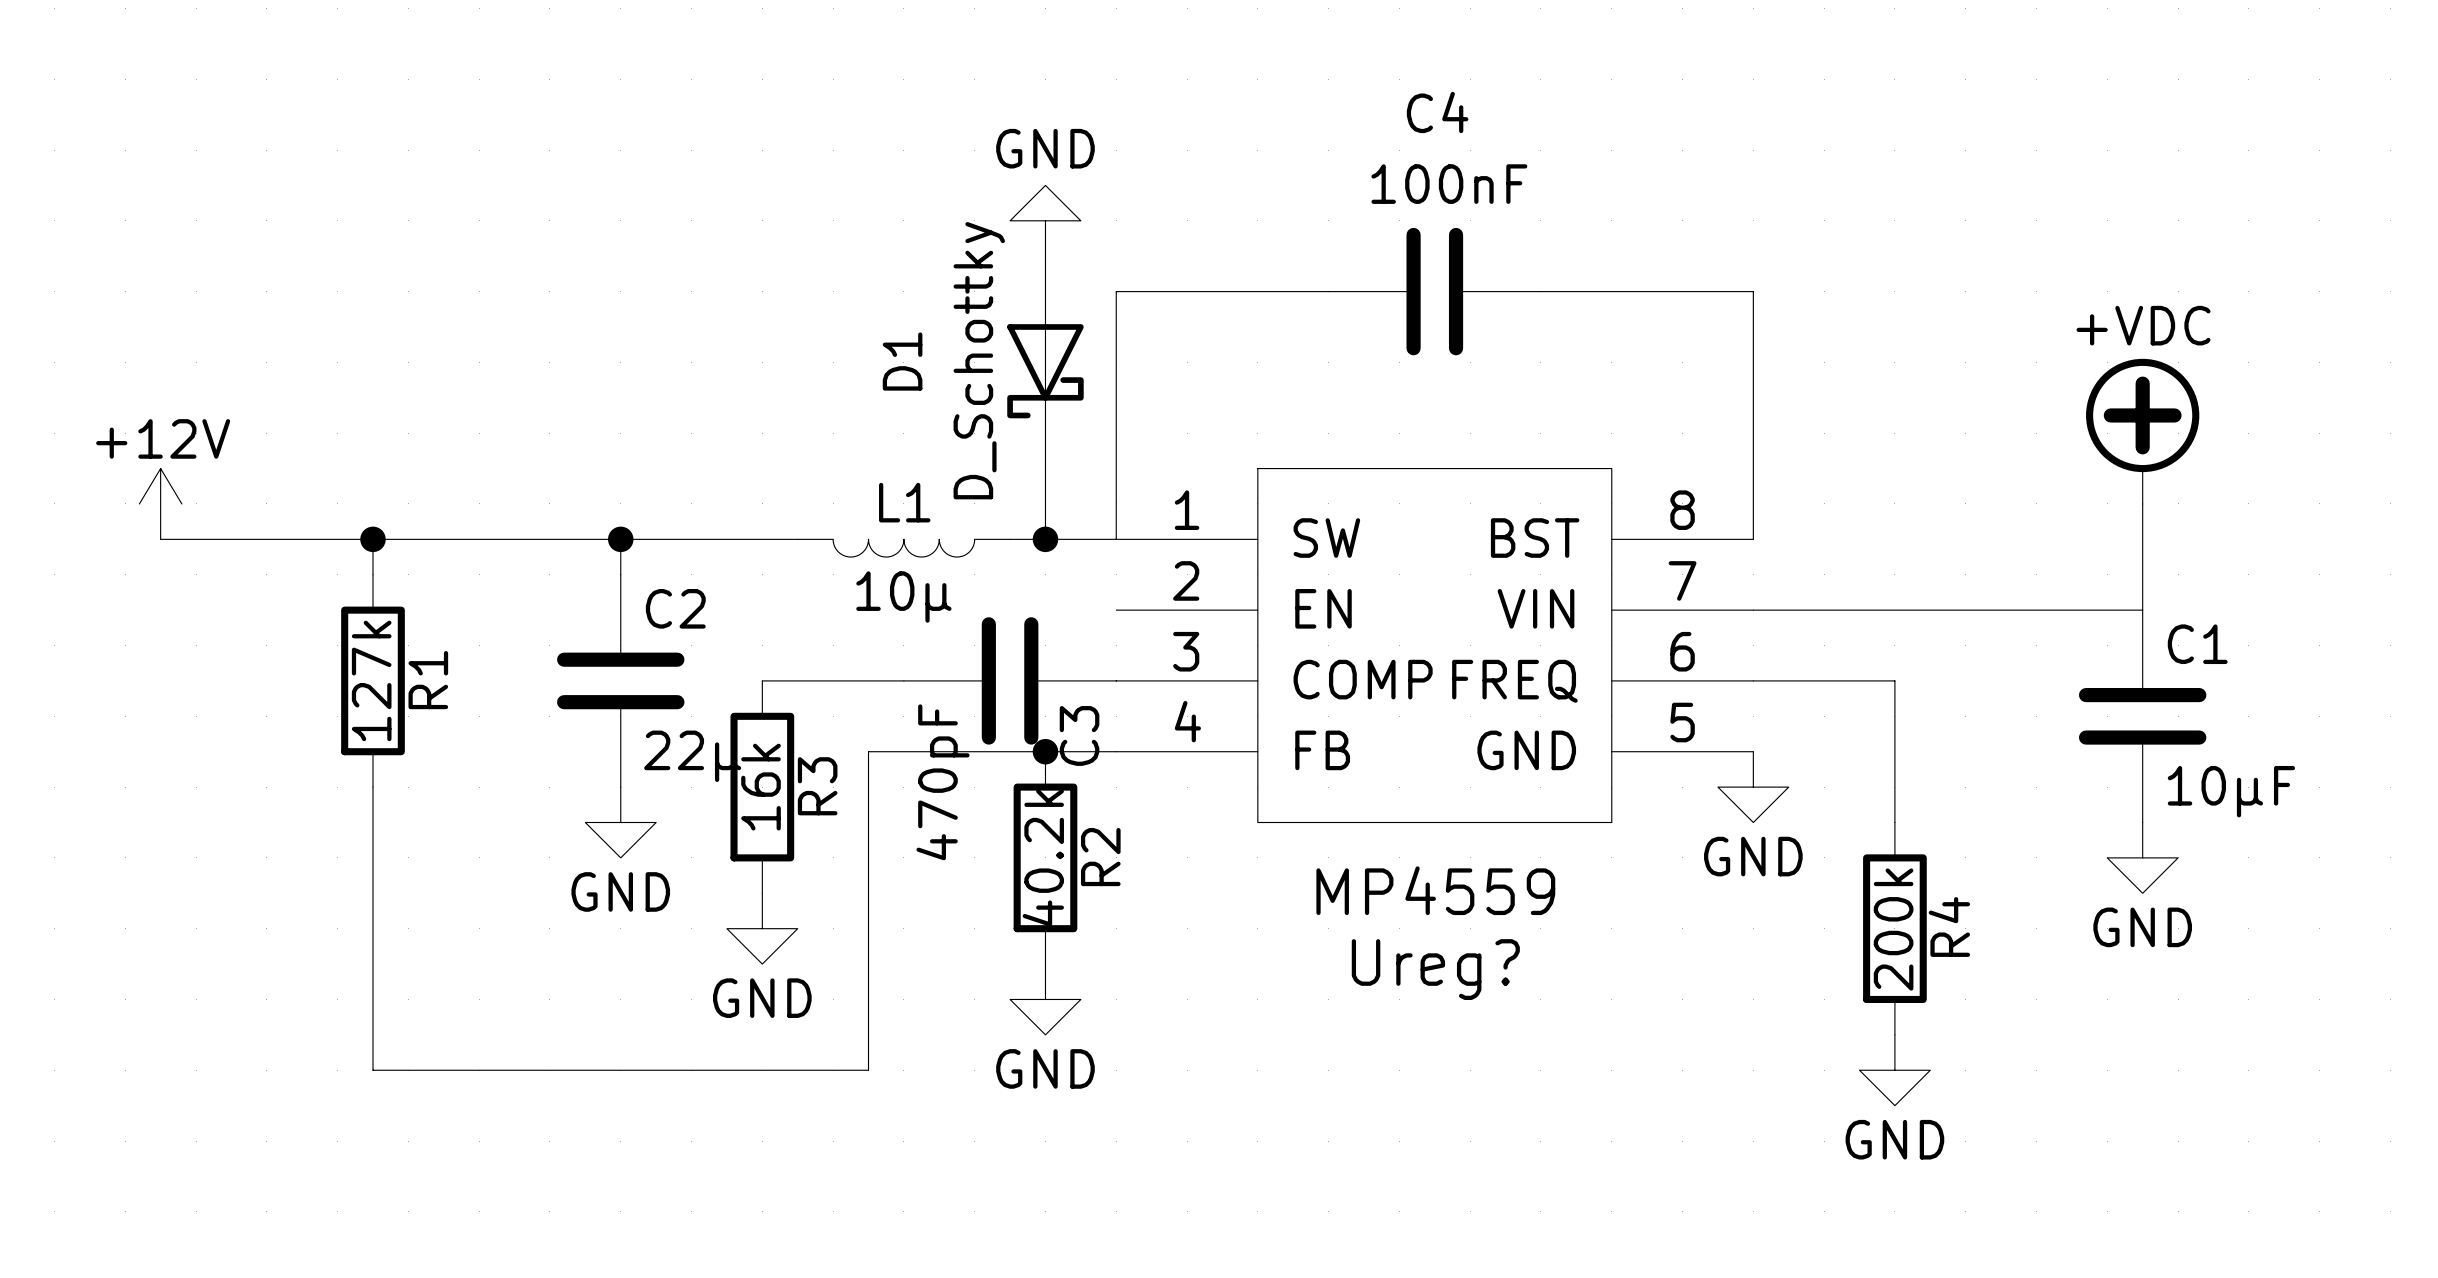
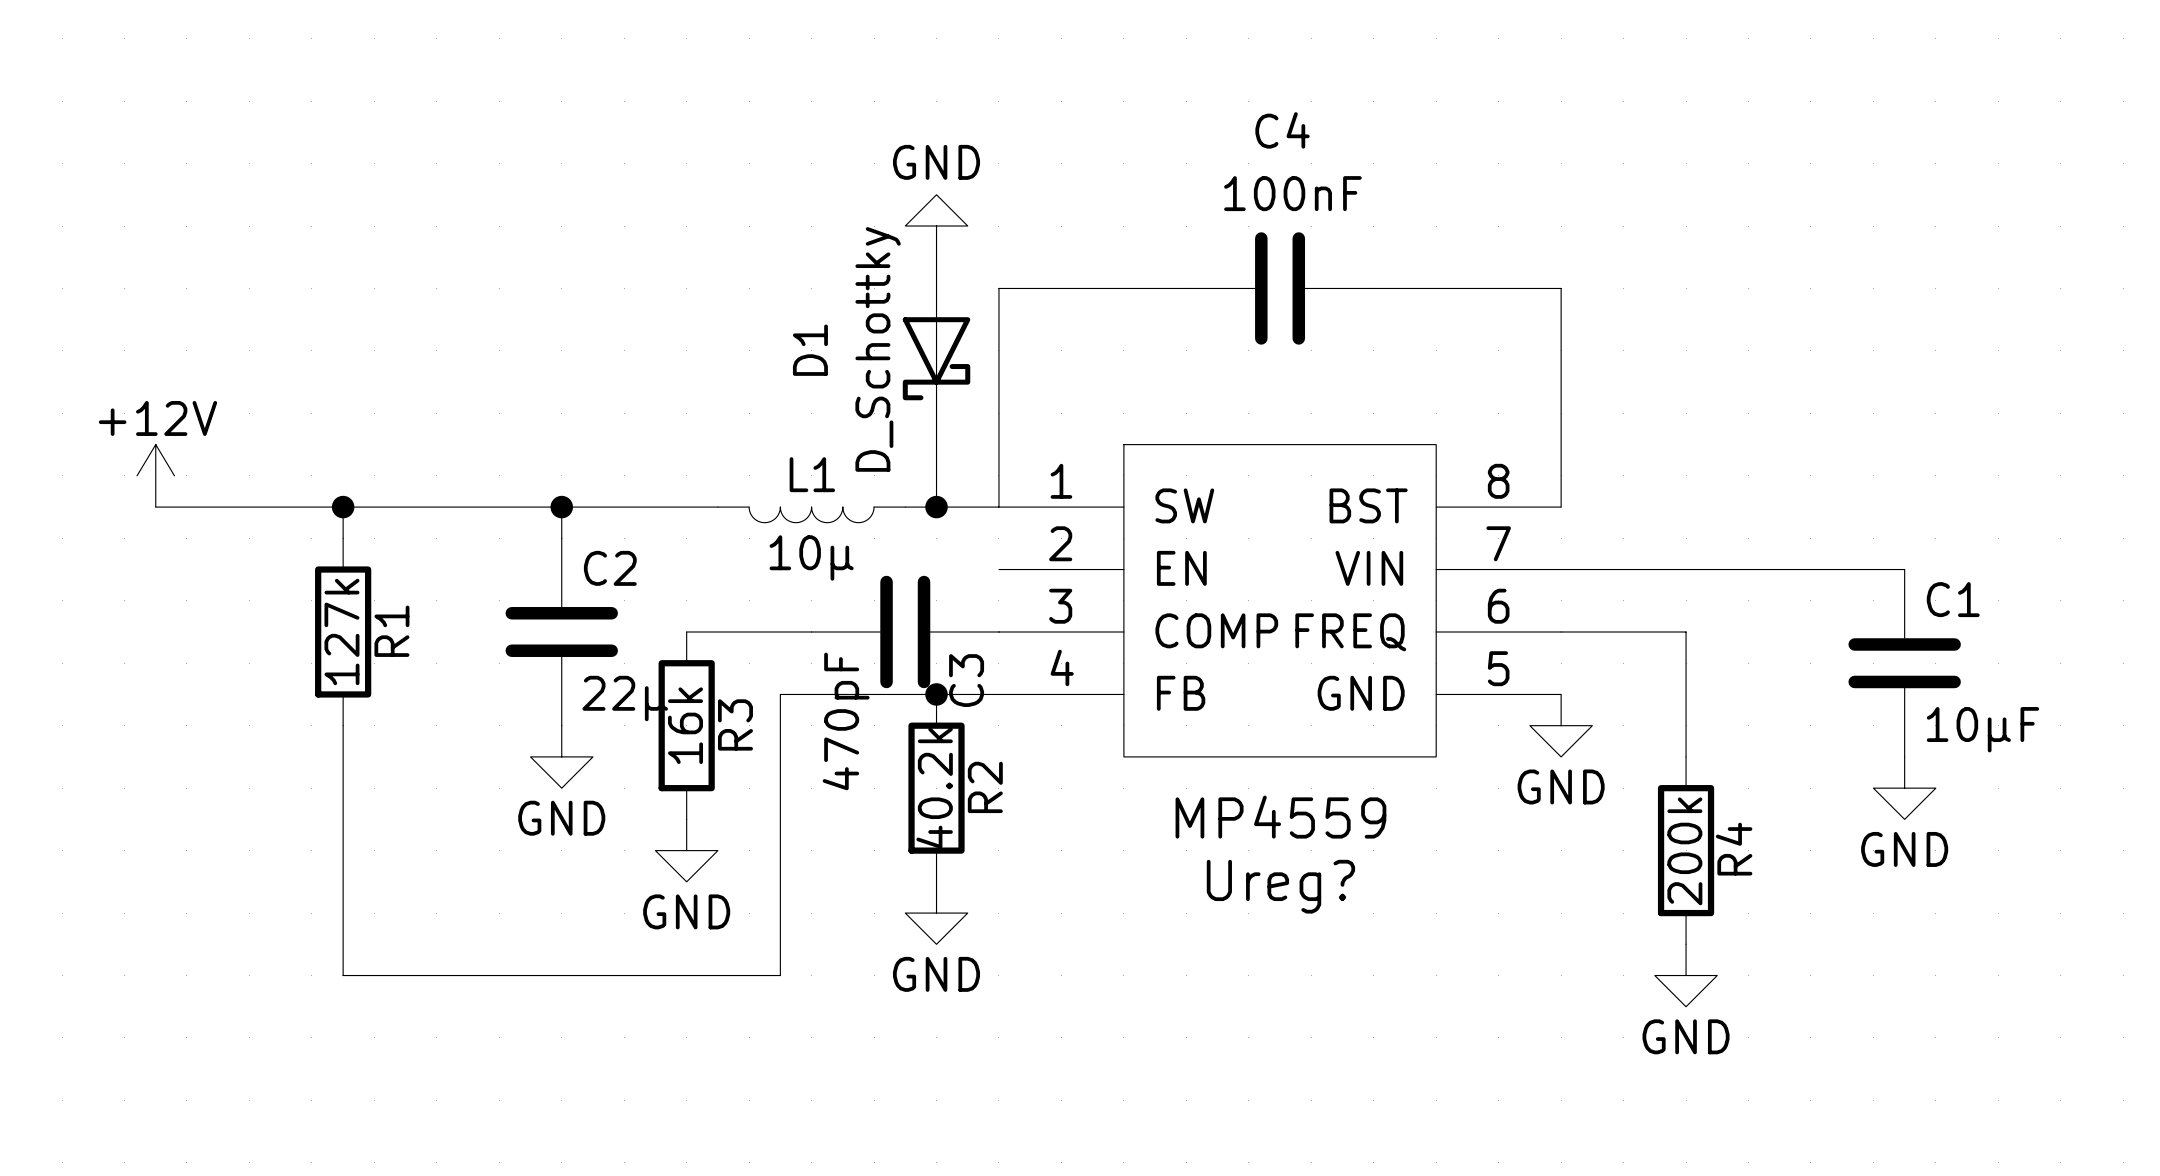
power symbol: +VDC (2142, 431) -> none
wire: (2142, 503) (2142, 610) -> none

